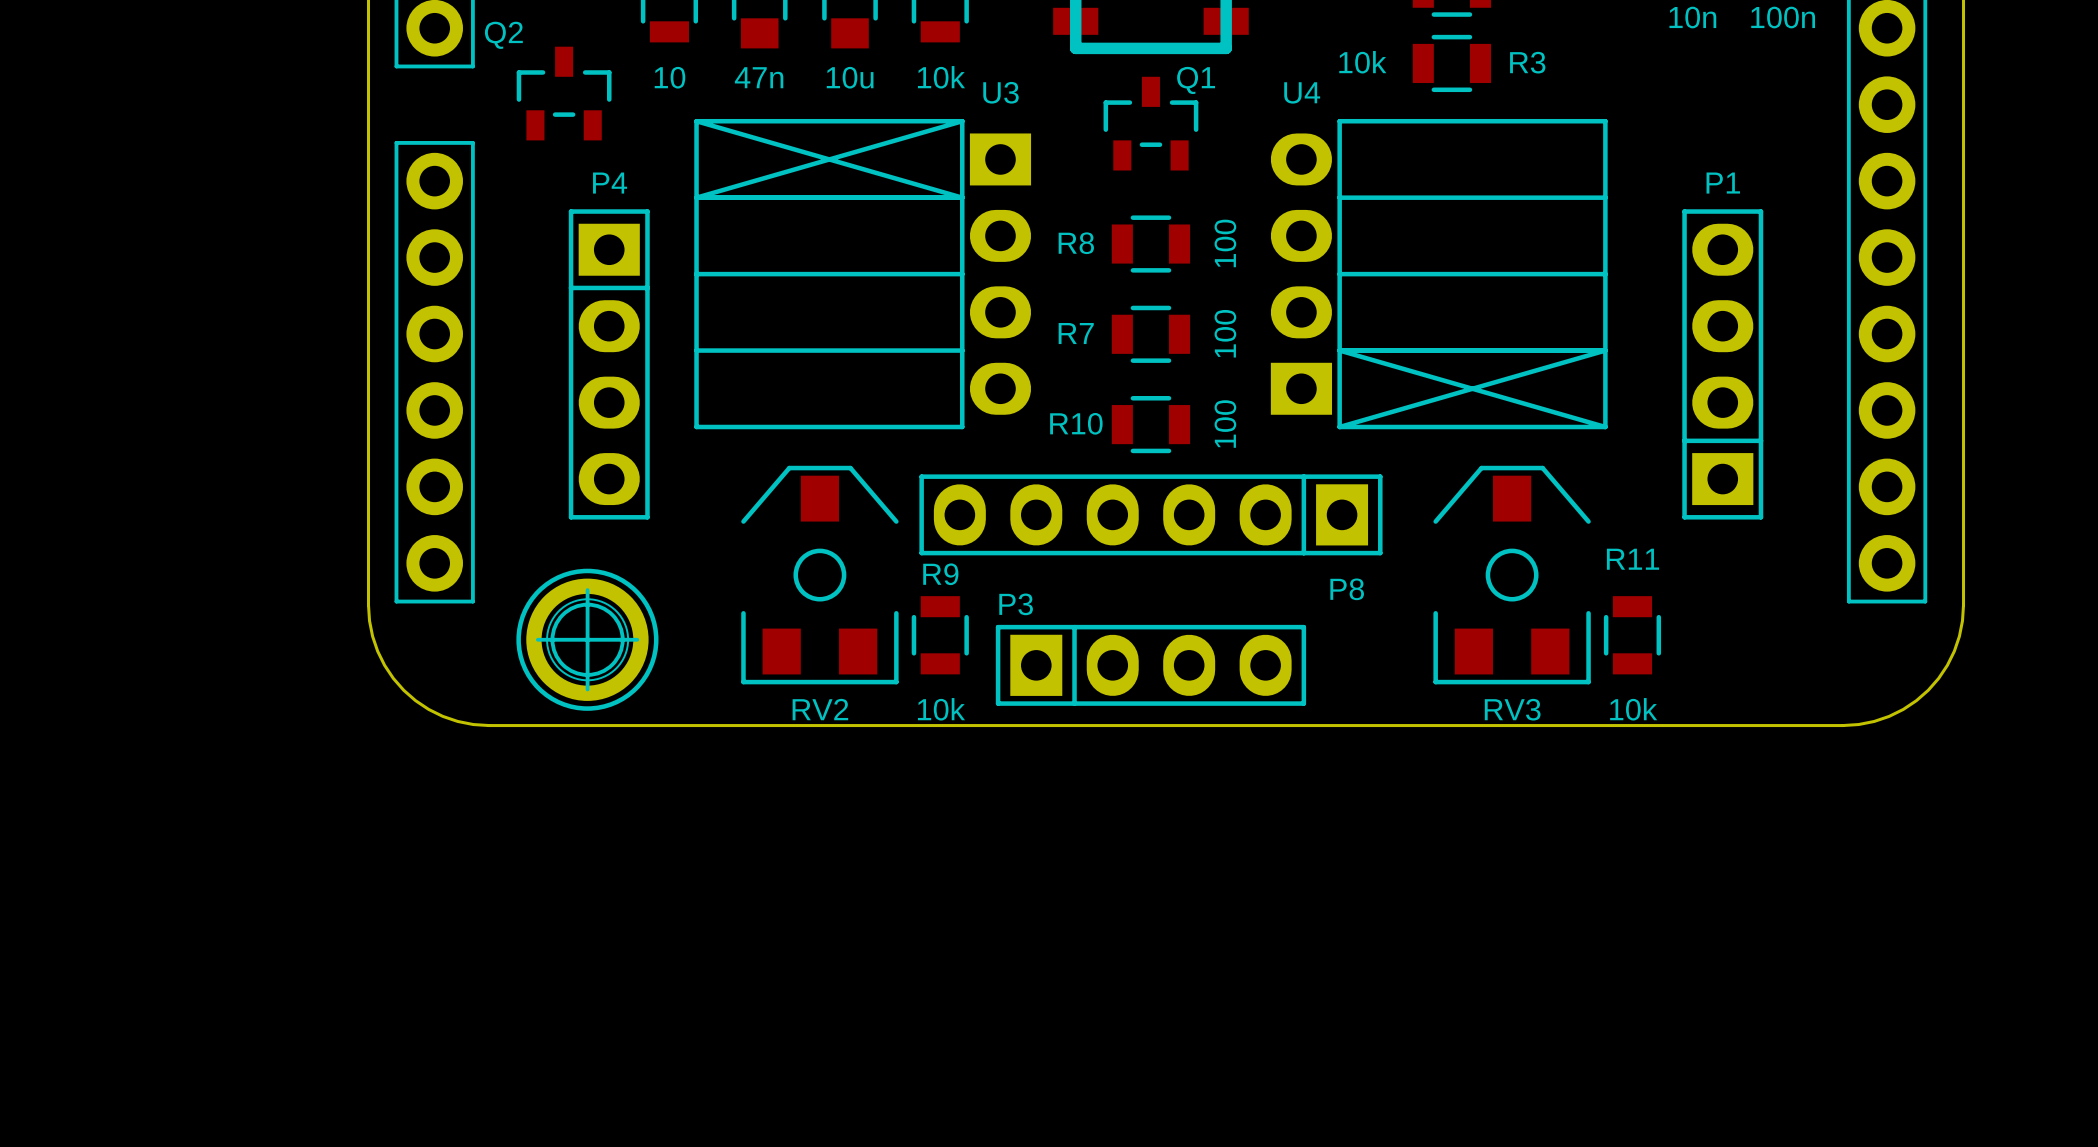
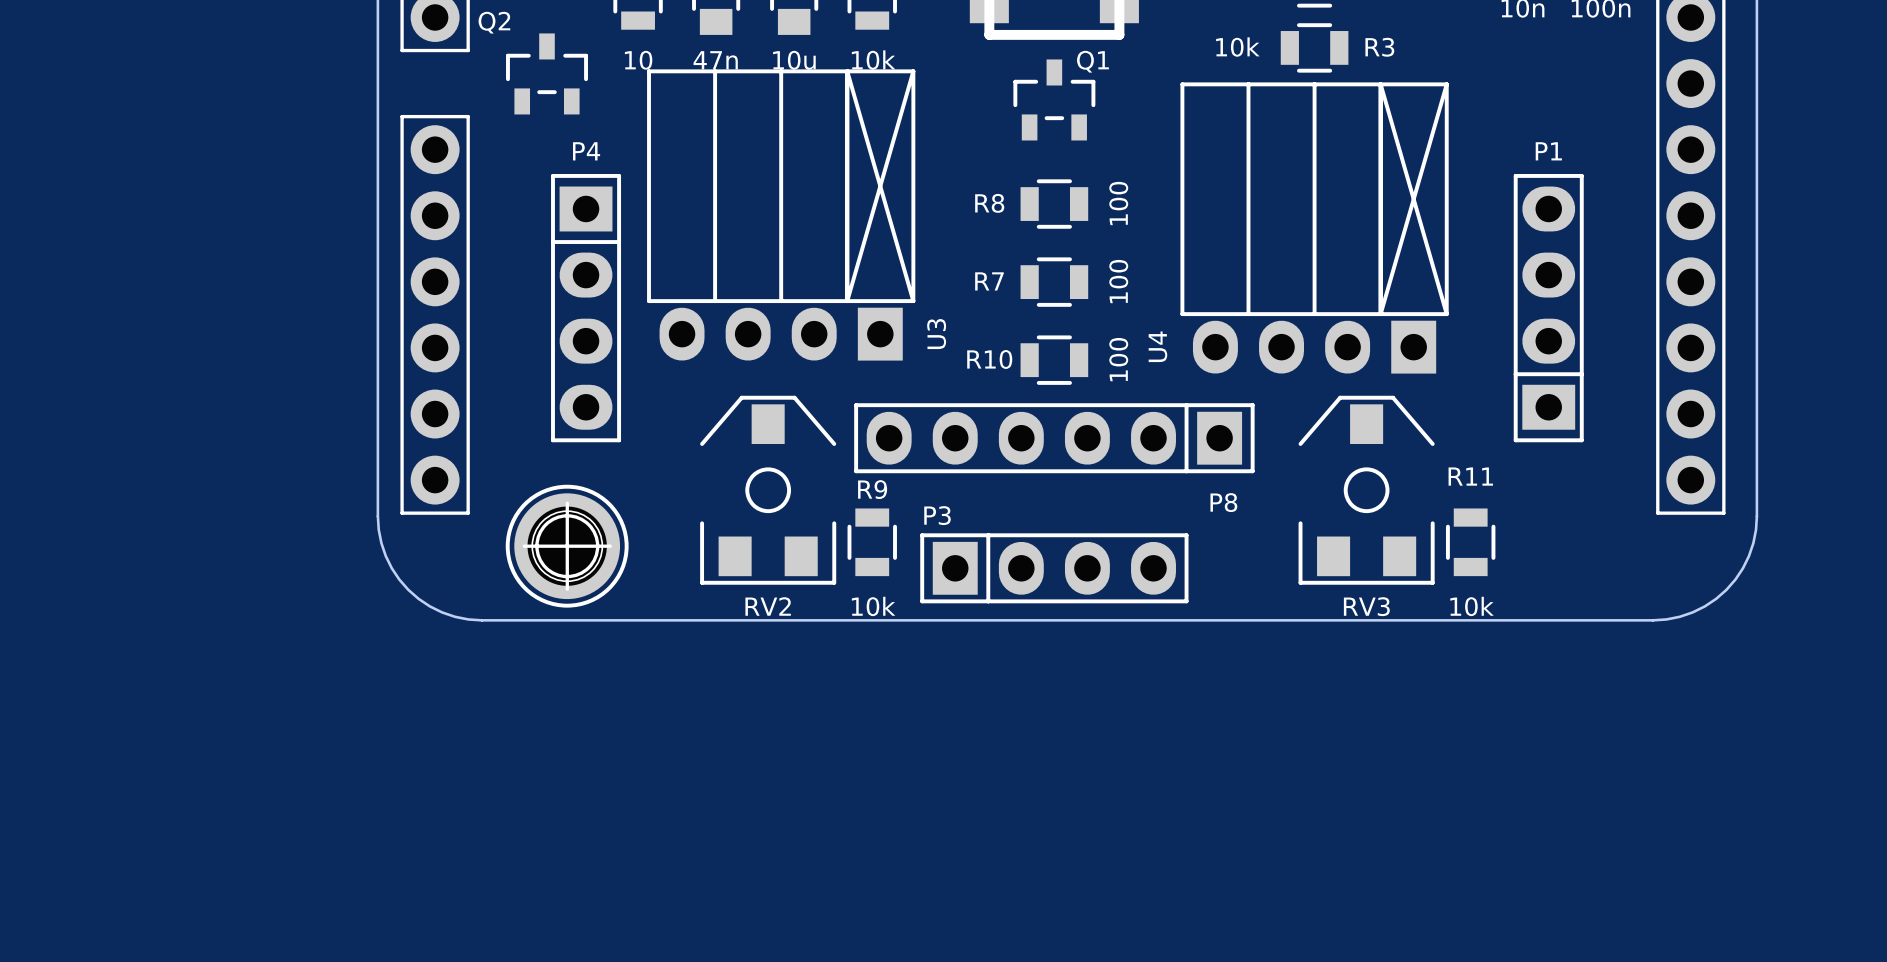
U3 rotation: 0° (862, 274) -> 90° clockwise (781, 214)
U4 rotation: 0° (1439, 274) -> 90° counterclockwise (1314, 227)

